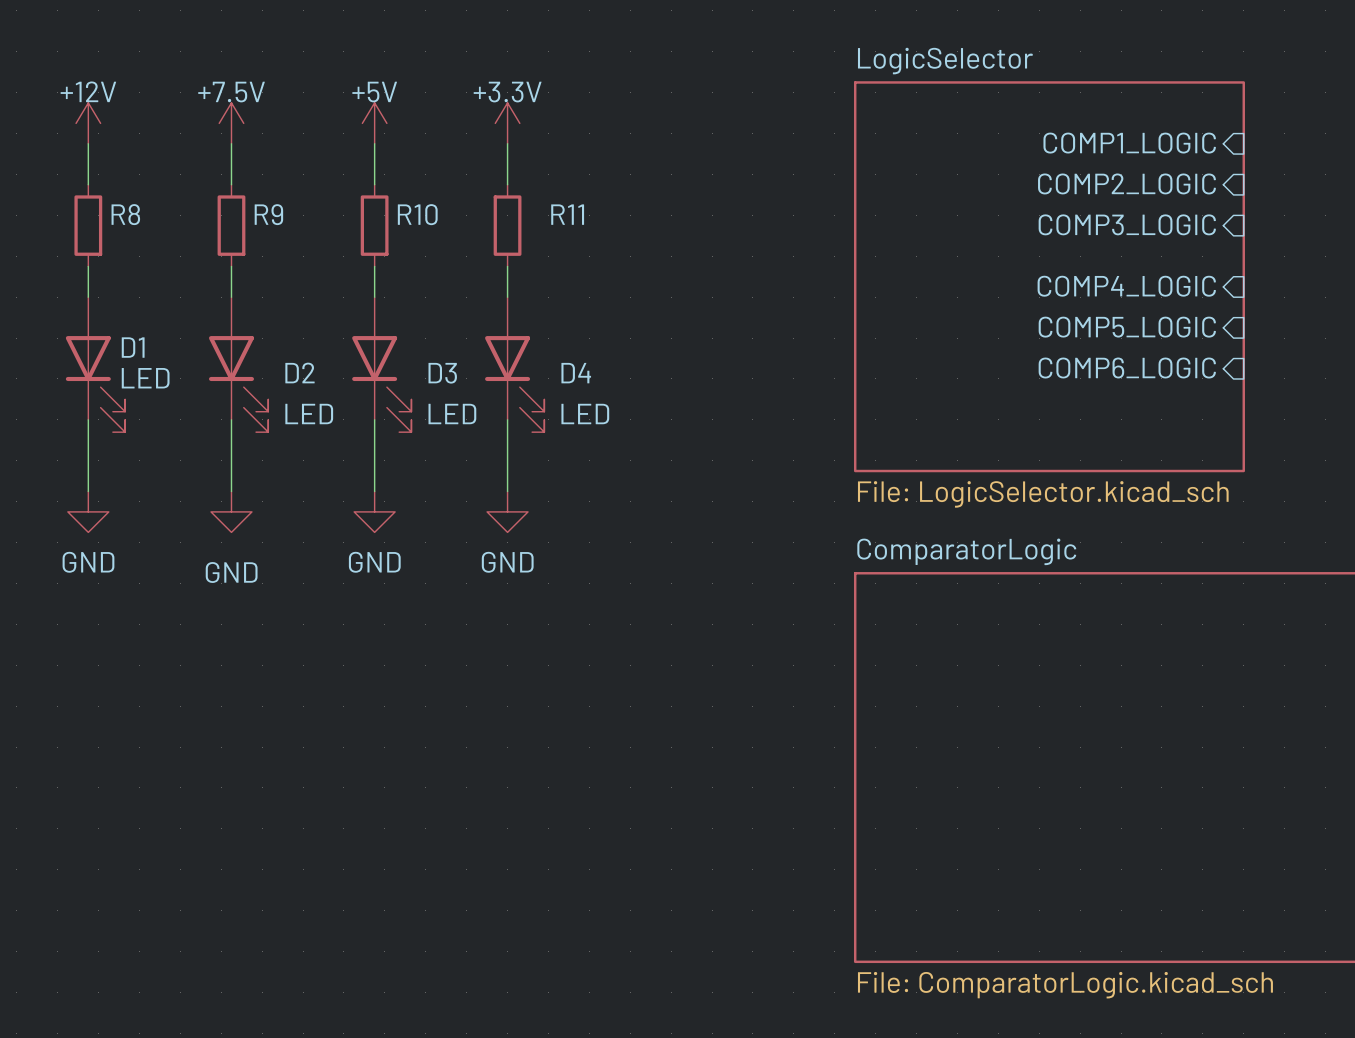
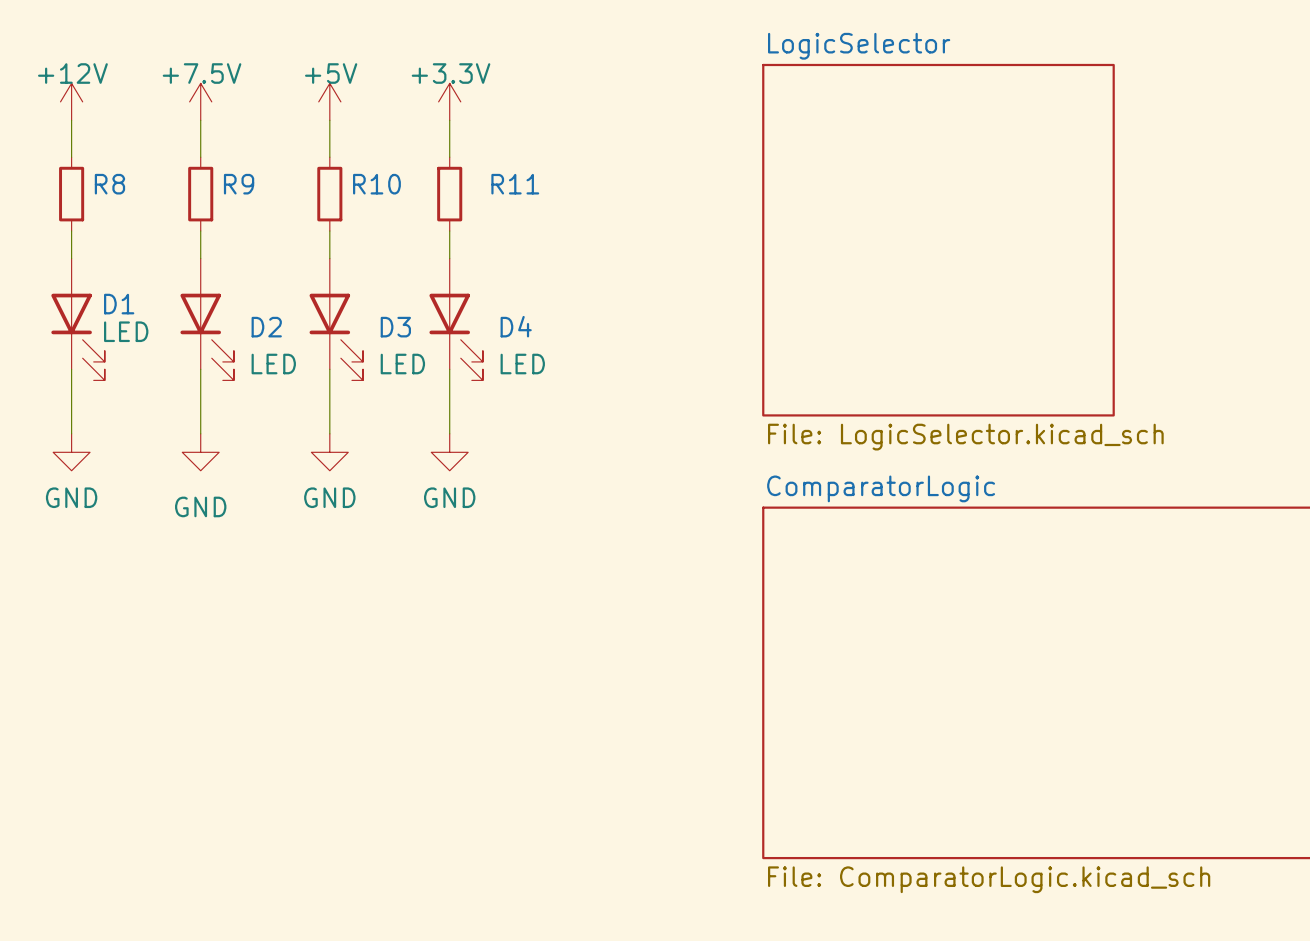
sheet pin: COMP1_LOGIC (1129, 143) -> none
sheet pin: COMP2_LOGIC (1126, 183) -> none
sheet pin: COMP3_LOGIC (1127, 224) -> none
sheet pin: COMP4_LOGIC (1126, 286) -> none
sheet pin: COMP5_LOGIC (1127, 327) -> none
sheet pin: COMP6_LOGIC (1127, 368) -> none

